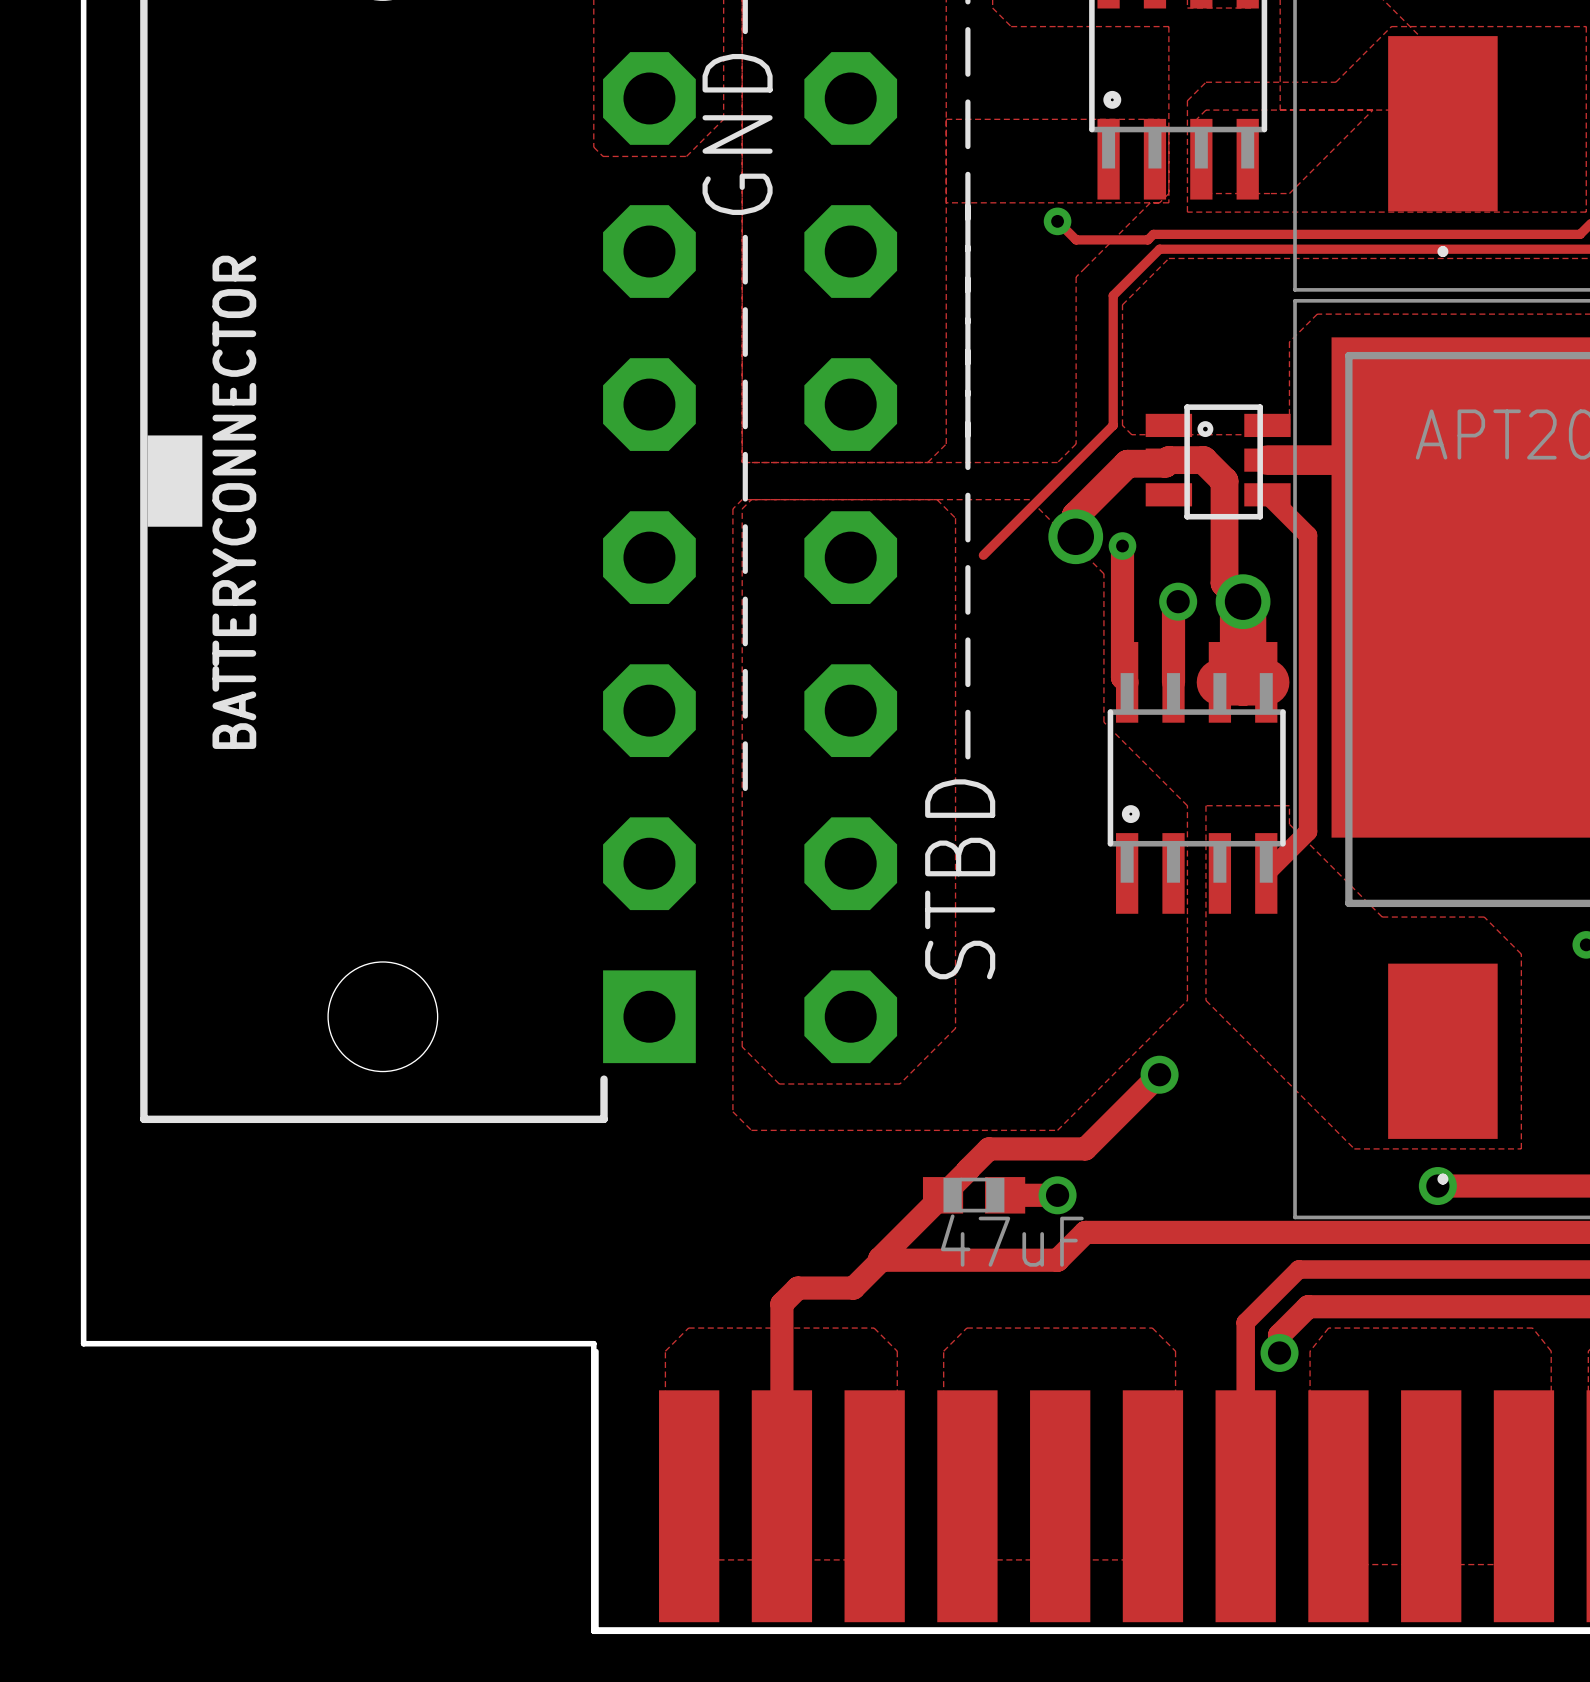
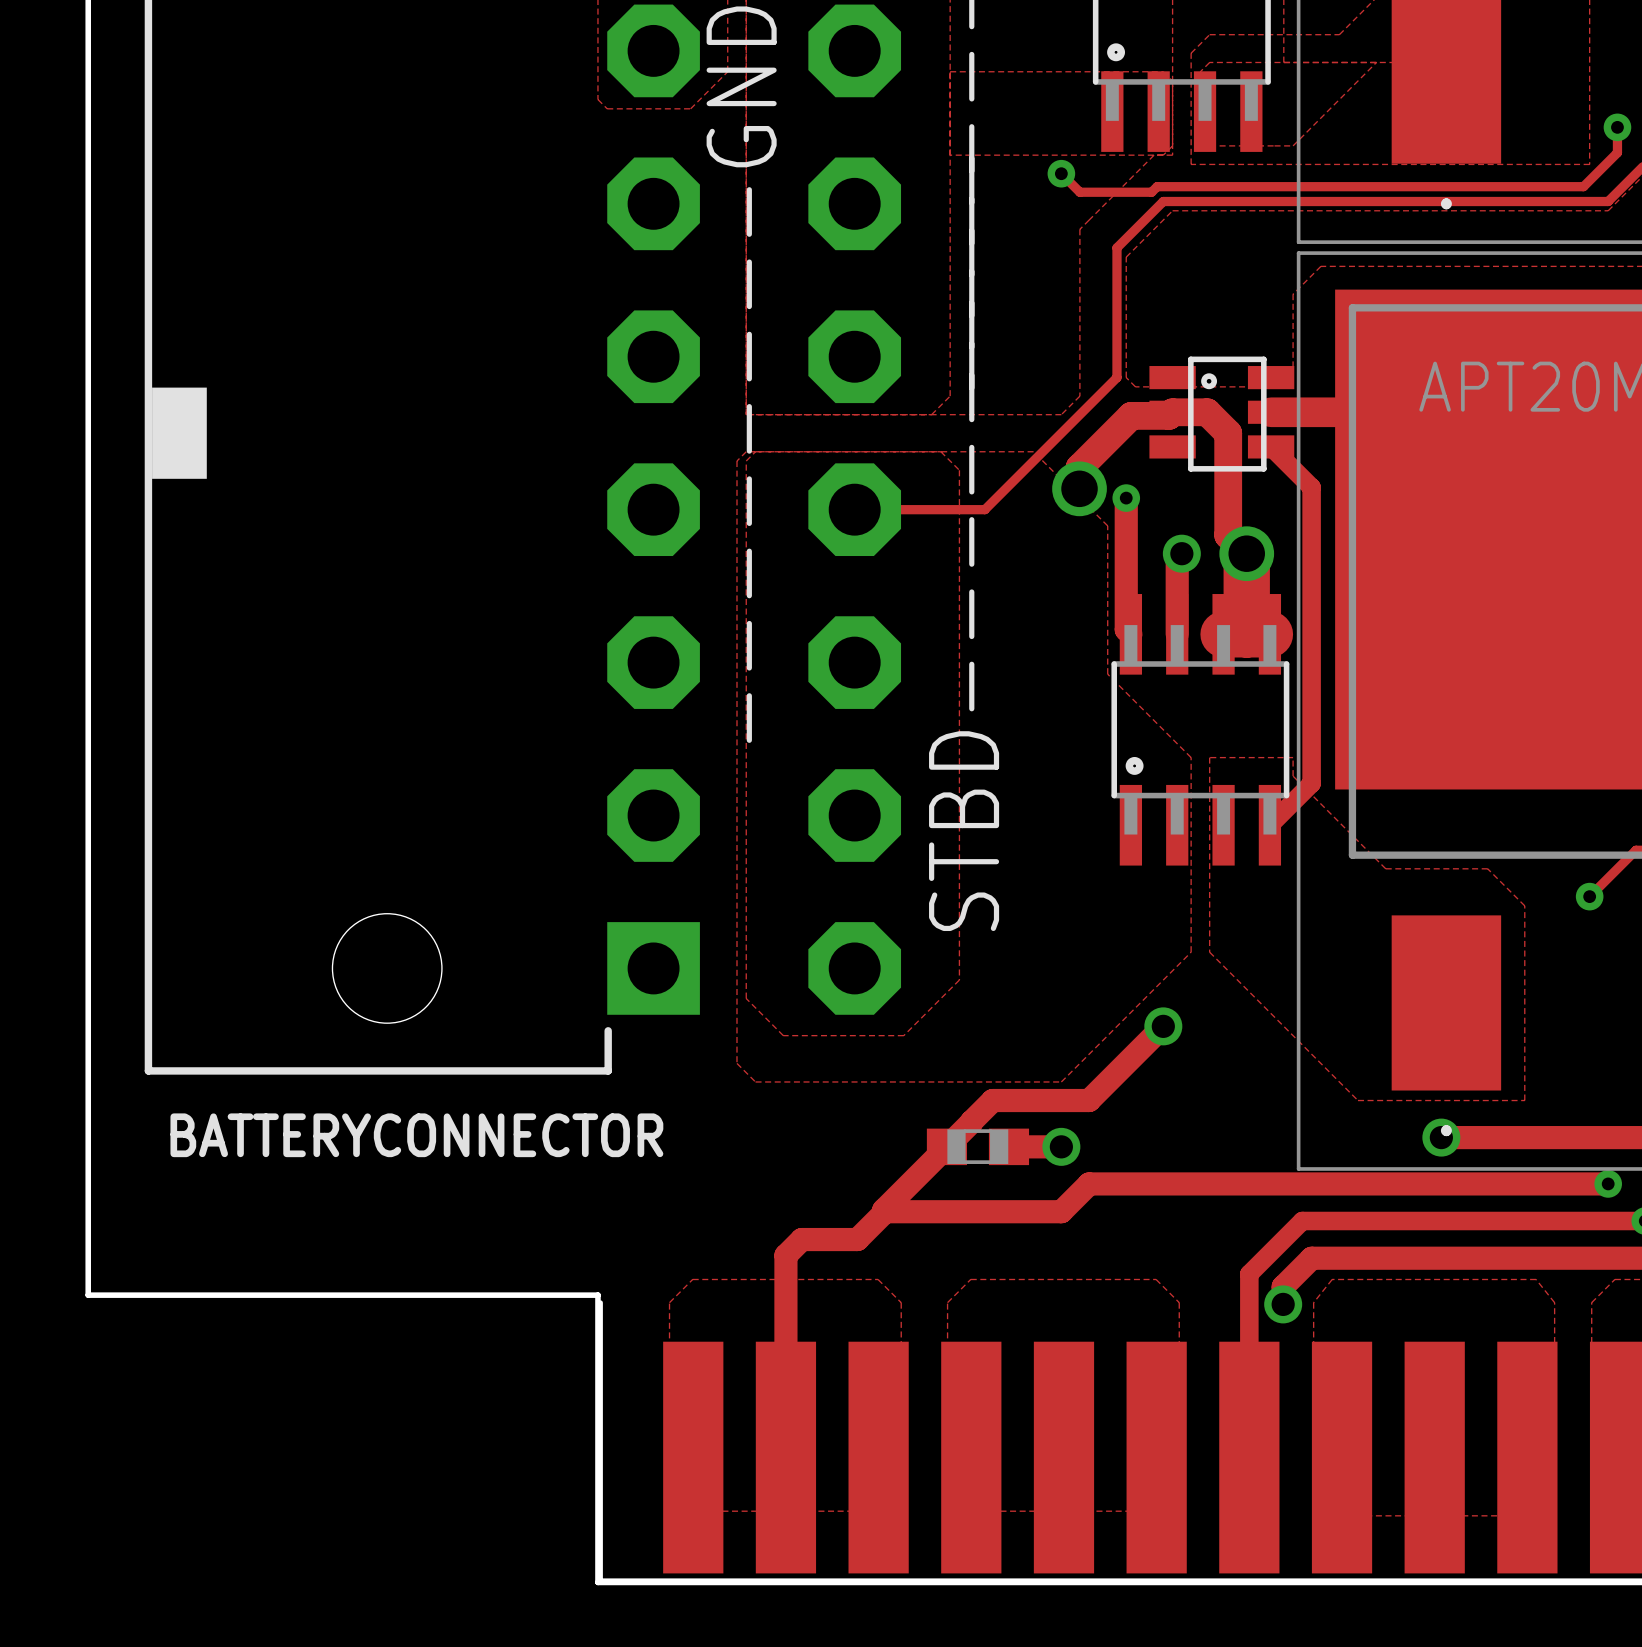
BATTERYCONNECTOR name rotation: 0° (234, 502) -> 90° clockwise (416, 1135)
BATTERYCONNECTOR name position: BATTERYCONNECTOR (234, 502) -> BATTERYCONNECTOR (416, 1135)
track: none -> (987, 507) (984, 509) (854, 509)
part value: 47uF (1012, 1240) -> none

